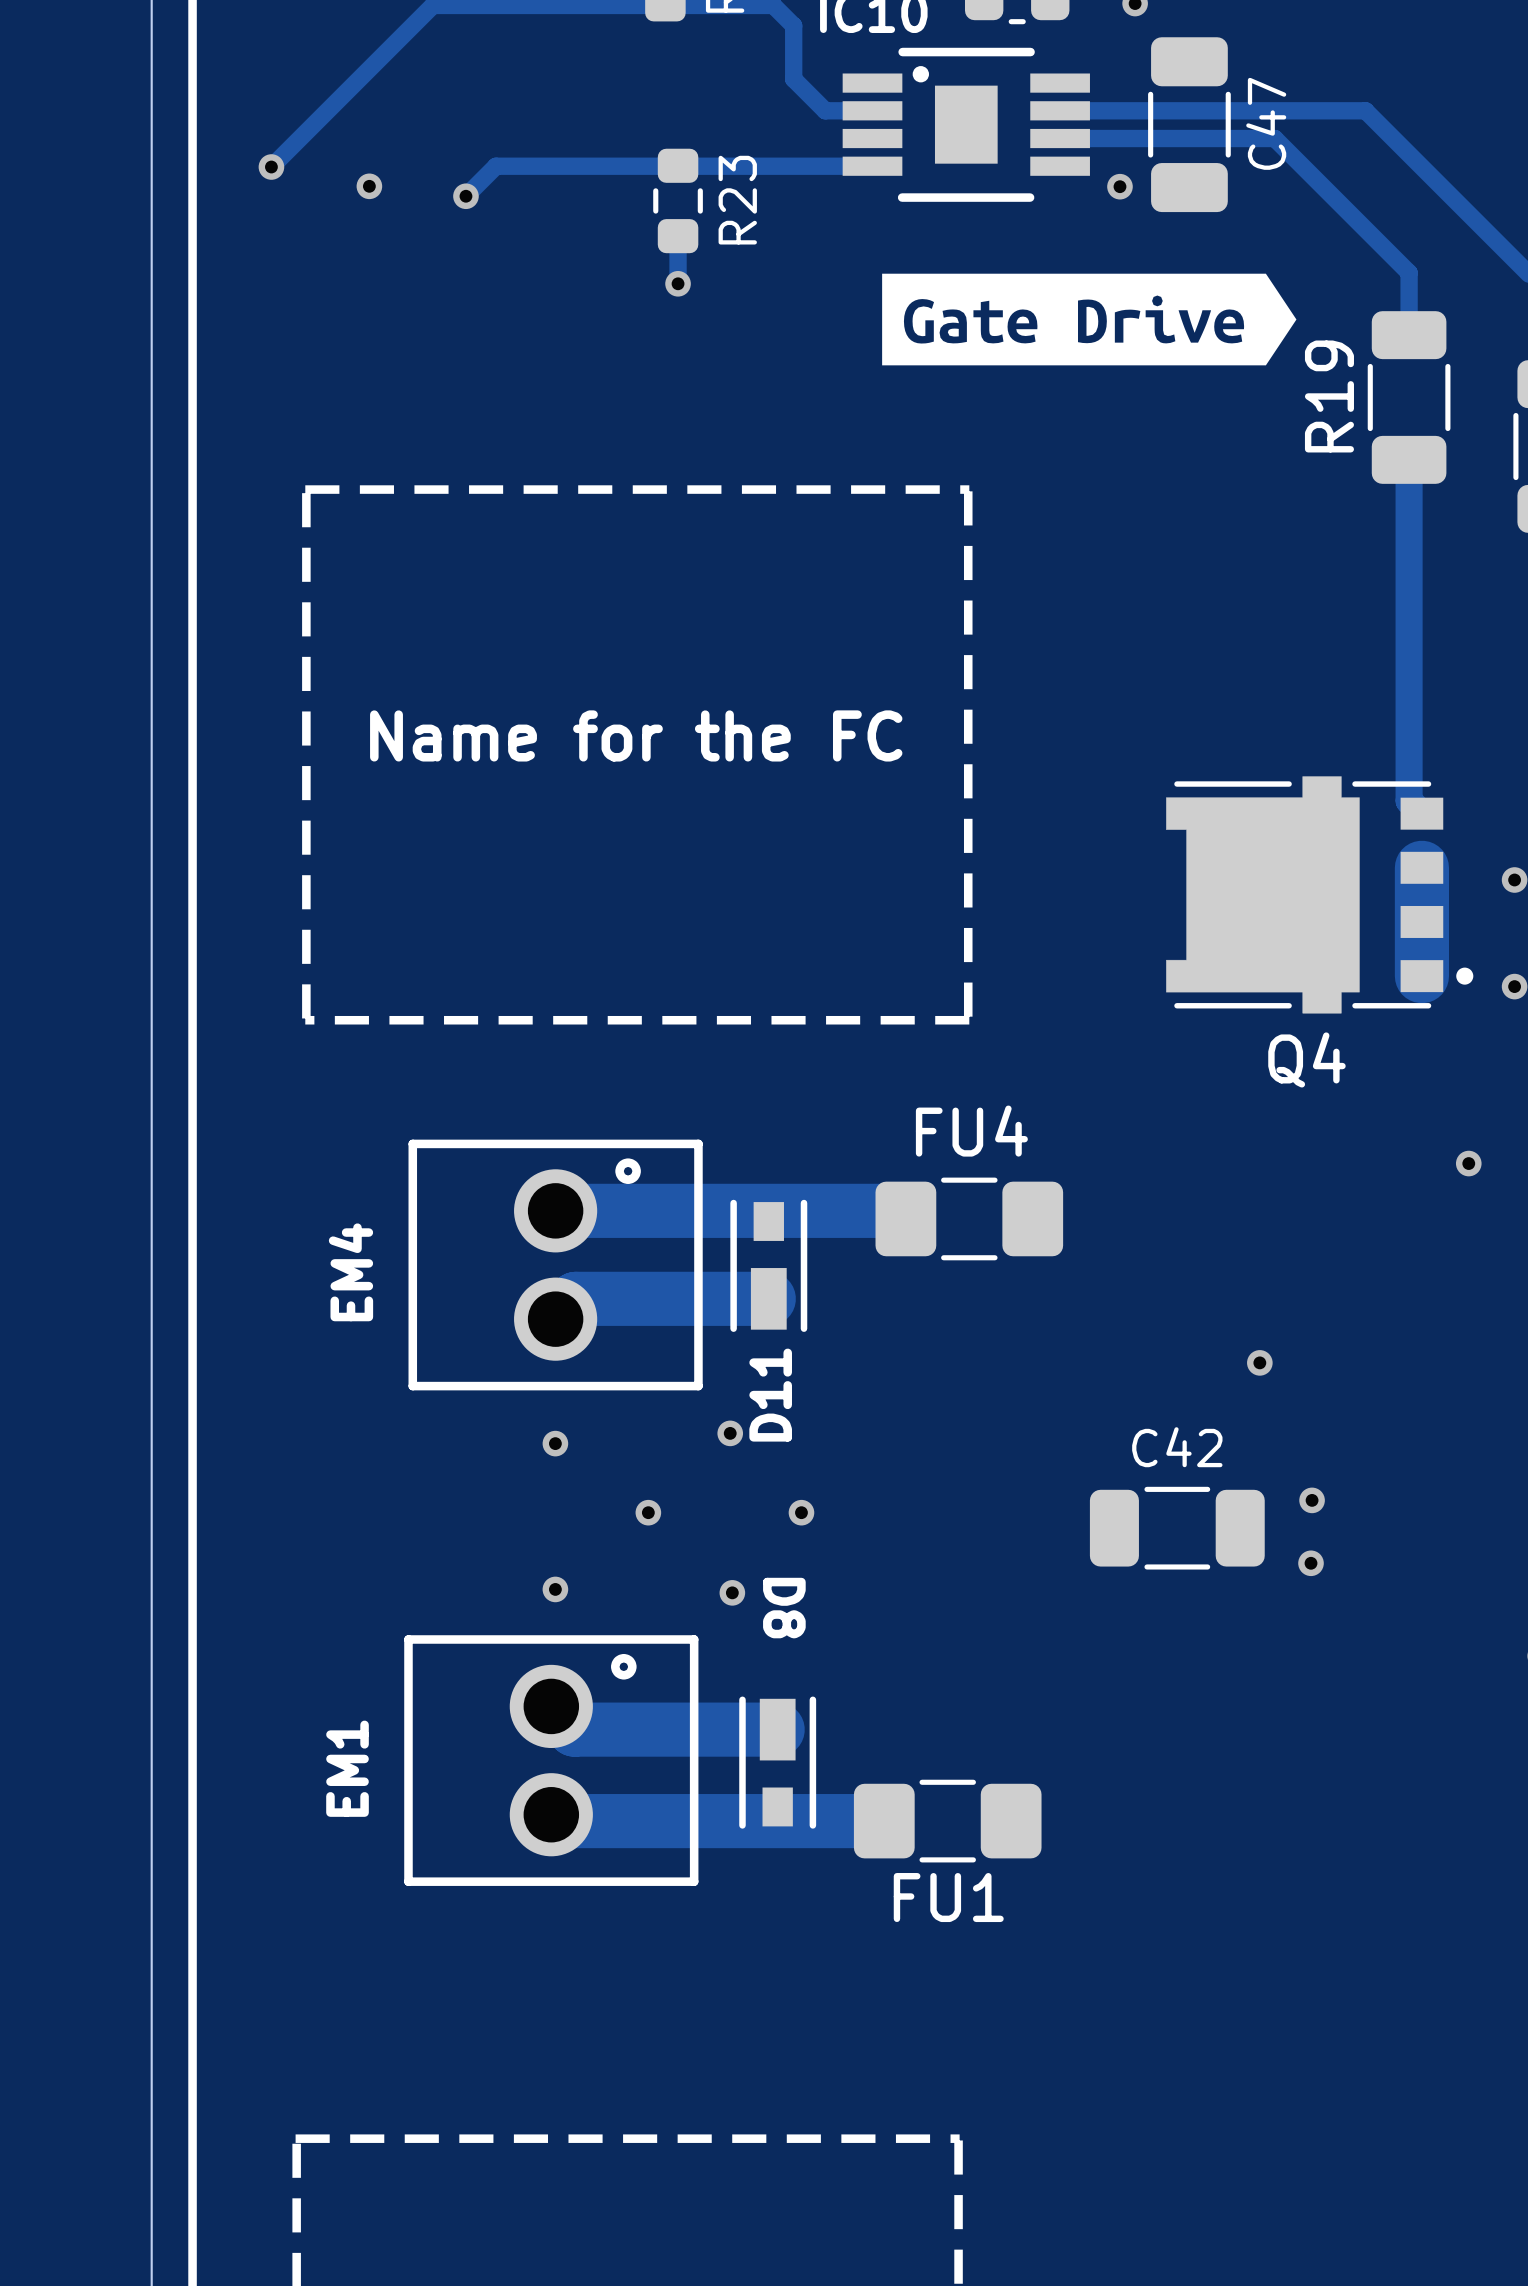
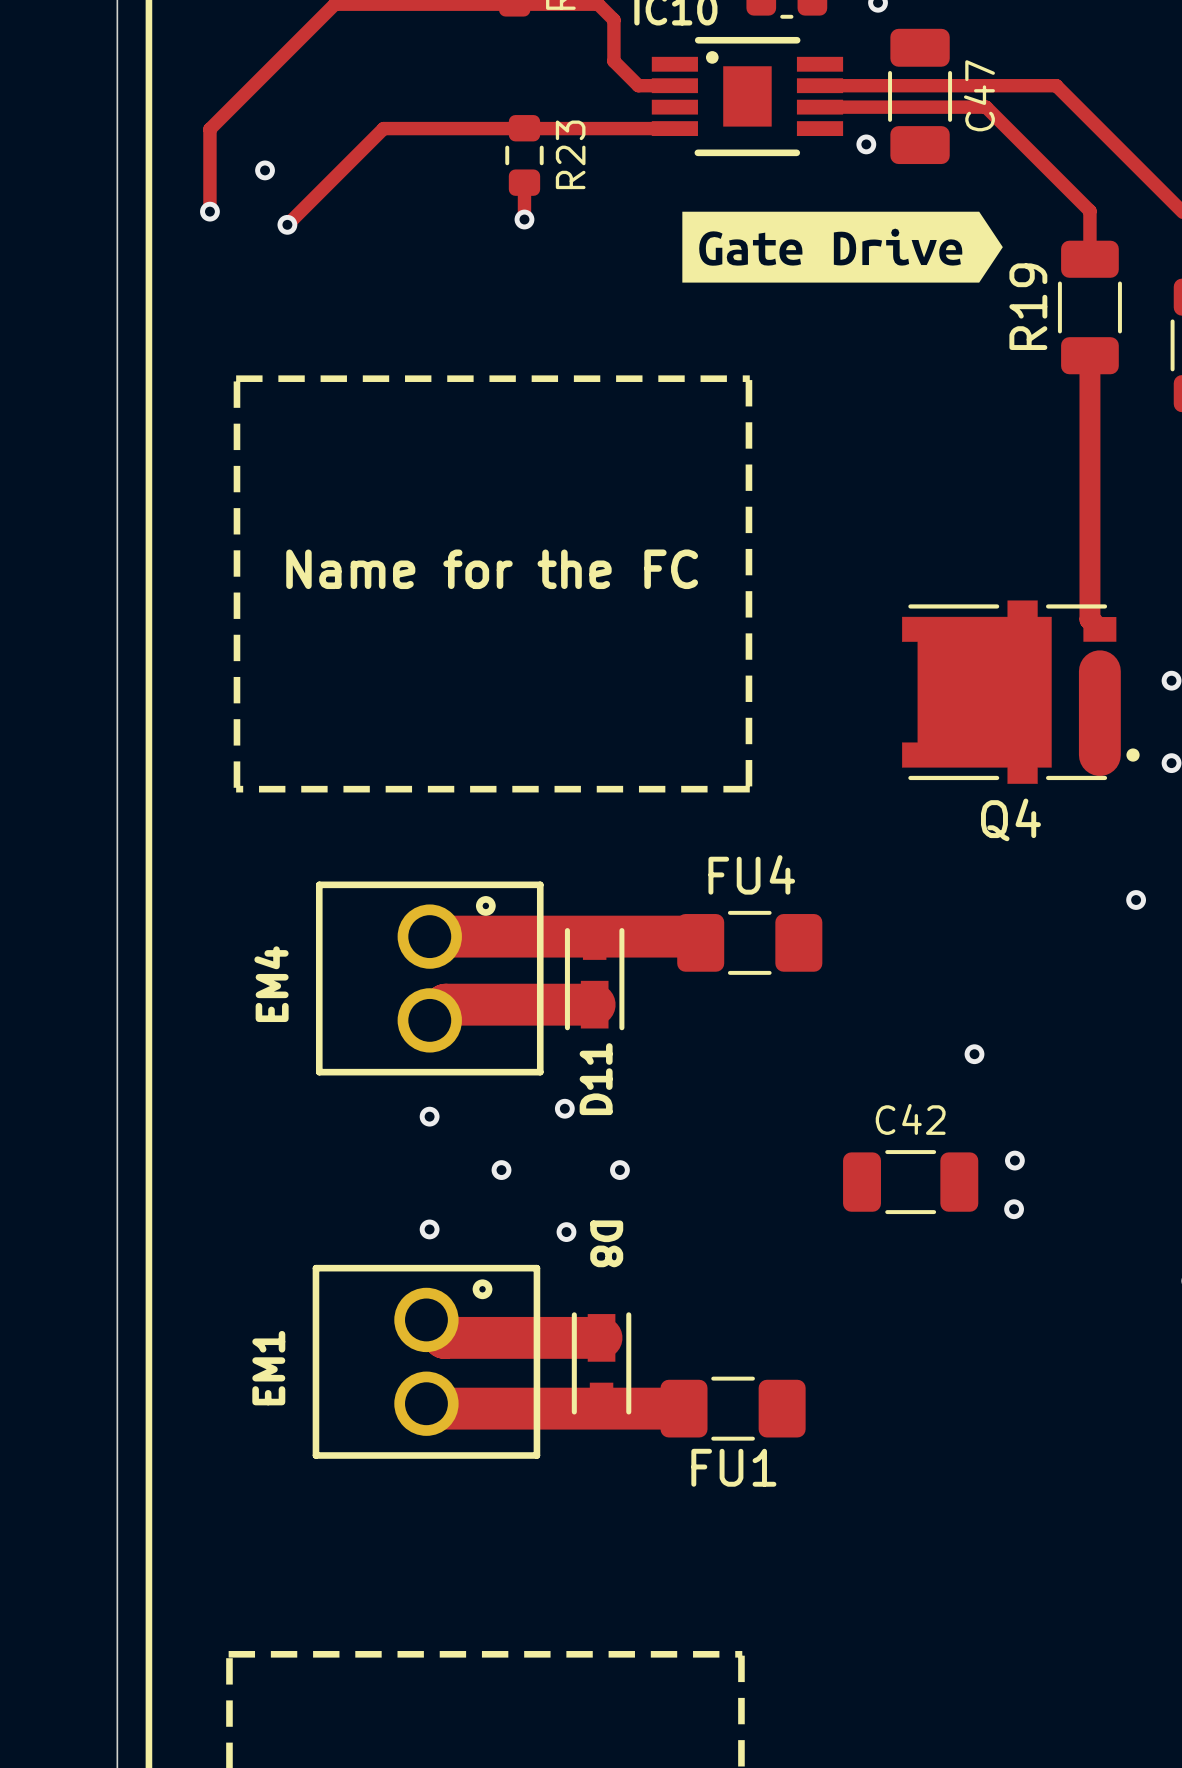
track: none -> (209, 129) (209, 211)
via: (271, 167) -> none
via position: (369, 186) -> (265, 170)
track: none -> (360, 151) (287, 224)
via: (465, 196) -> none
via: none -> (209, 211)
via: none -> (287, 224)

